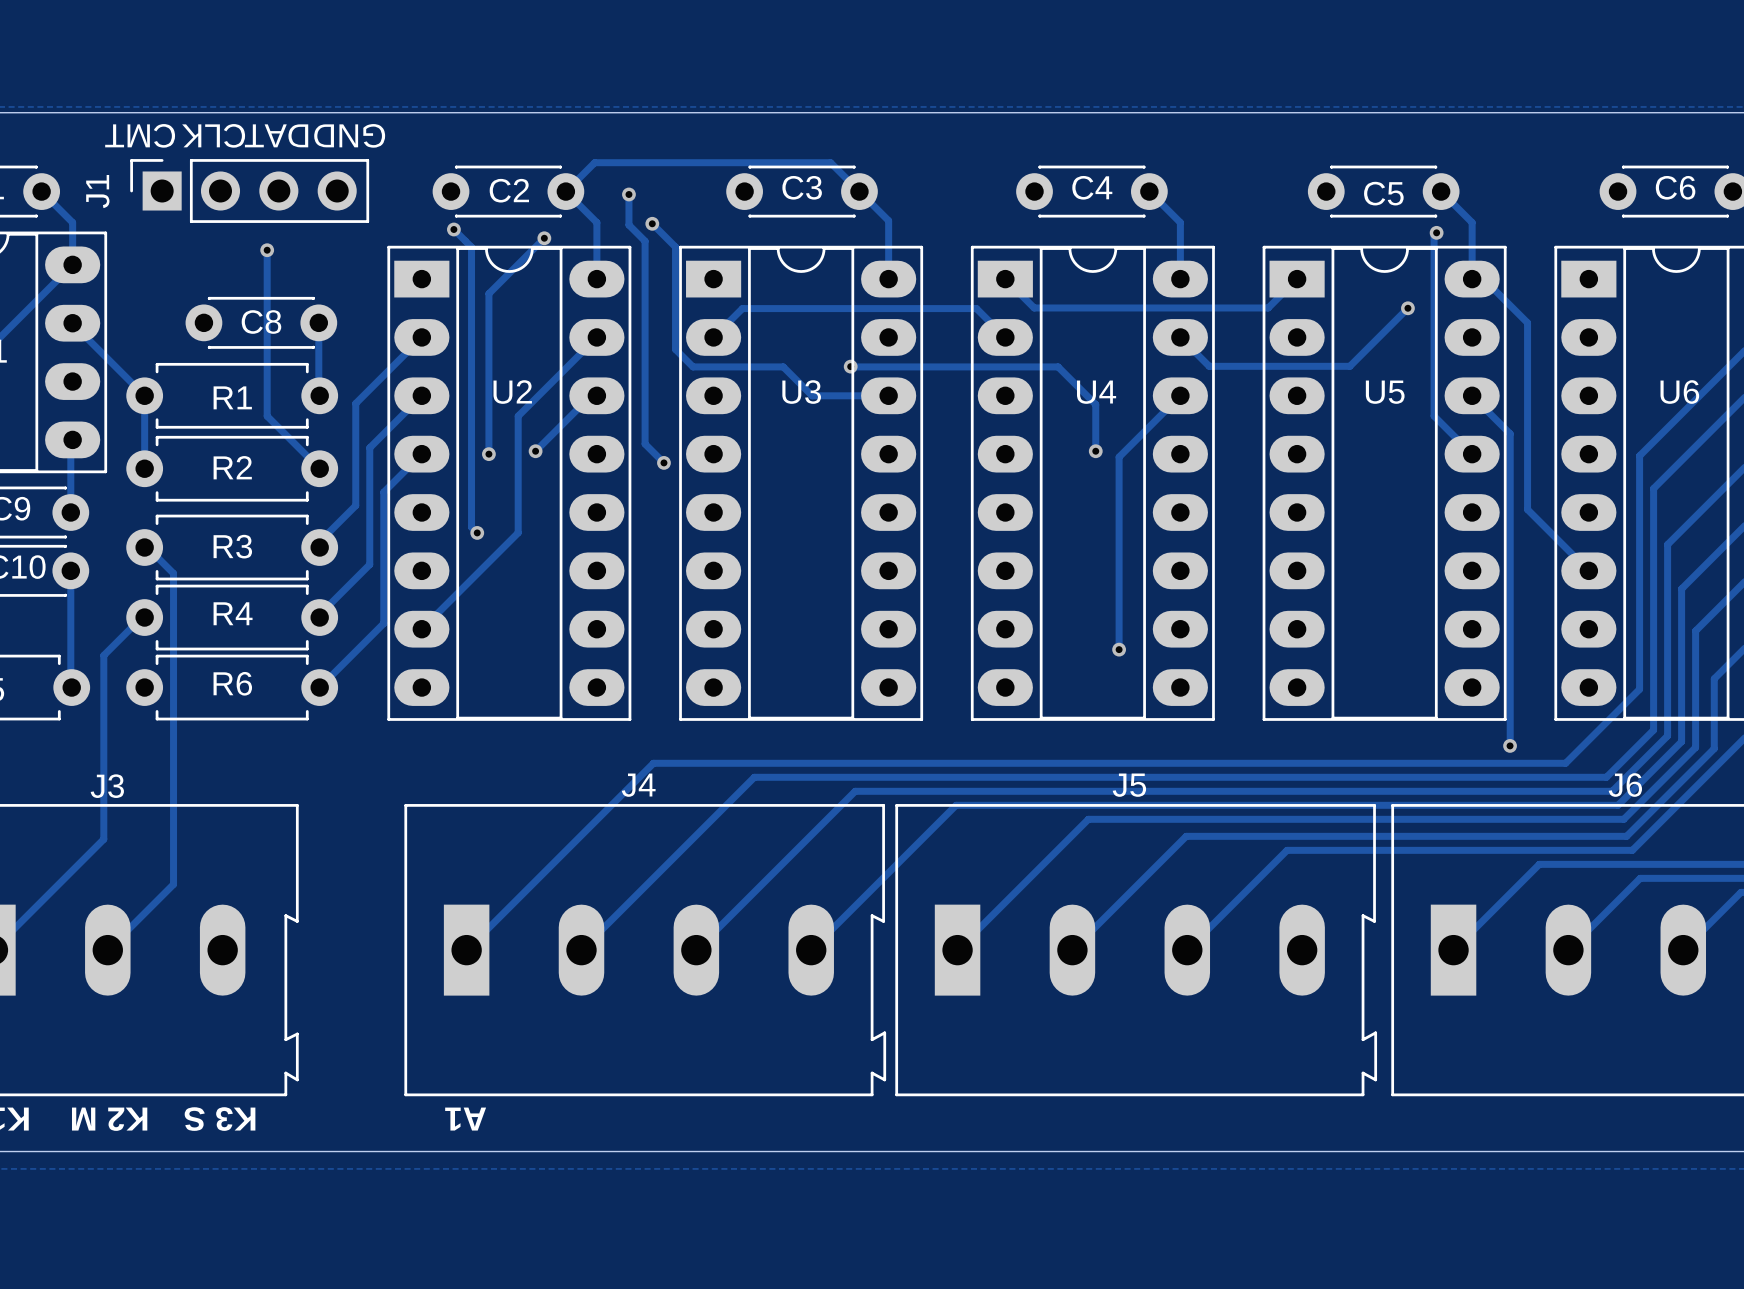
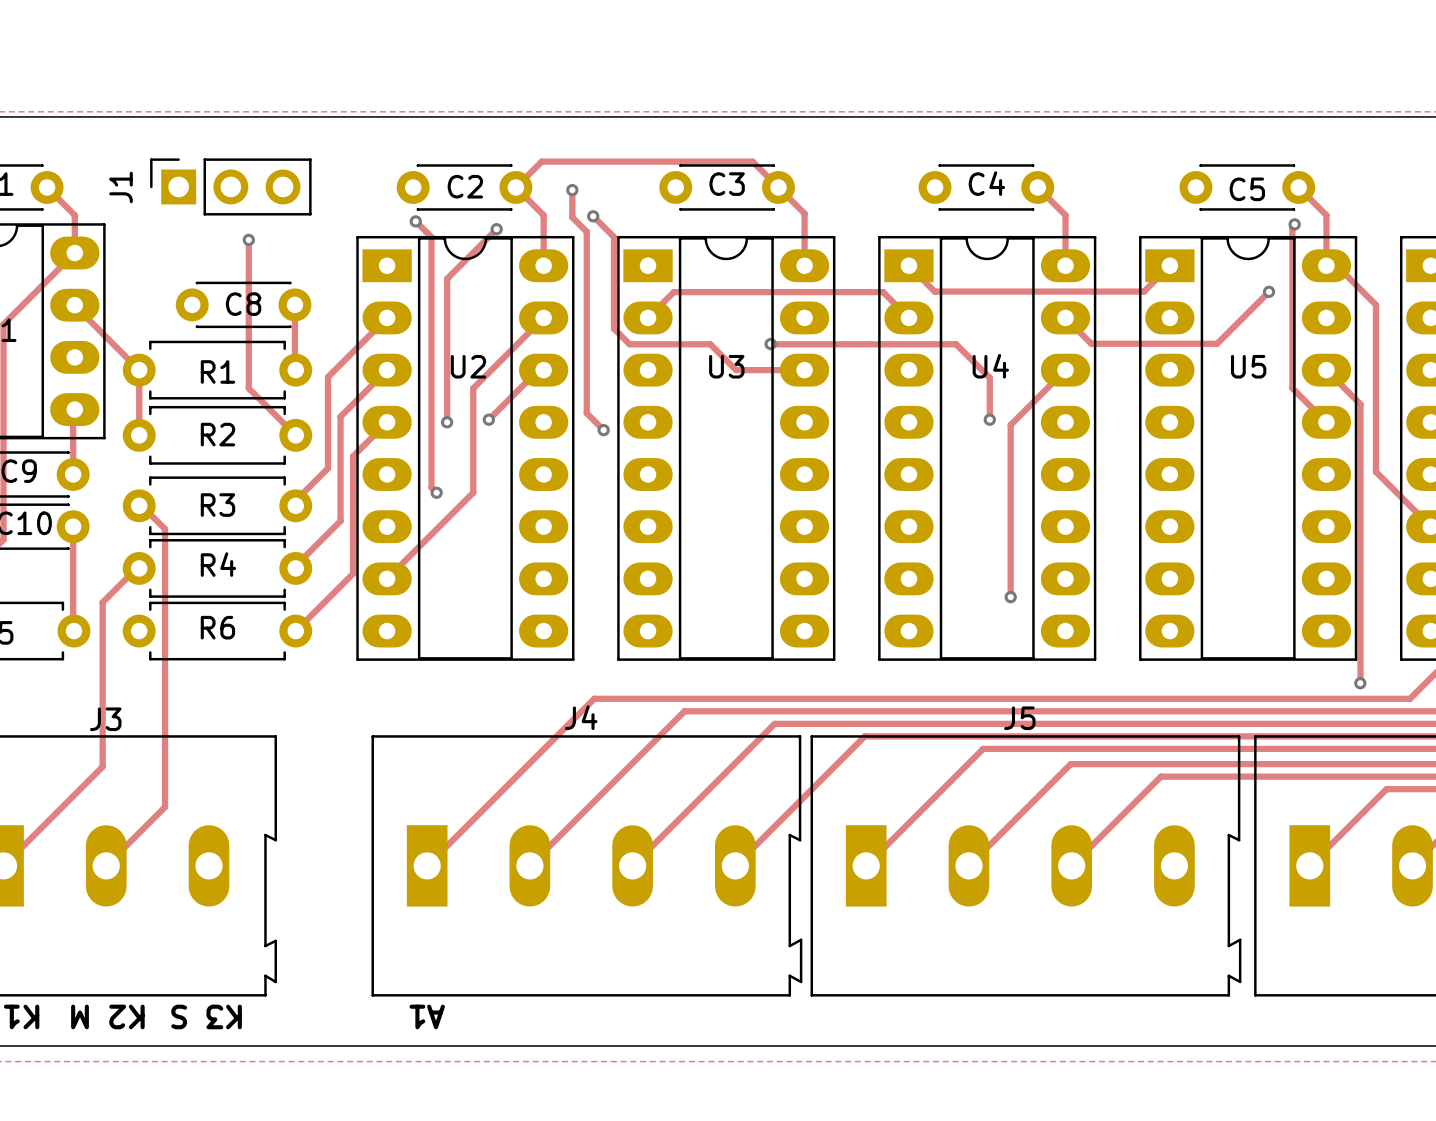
text: CMT (140, 135) -> none
text: CLK (213, 135) -> none
text: DAT (276, 135) -> none
text: GND (349, 135) -> none
J1 footprint: [130, 159, 370, 223] -> [150, 158, 312, 216]

